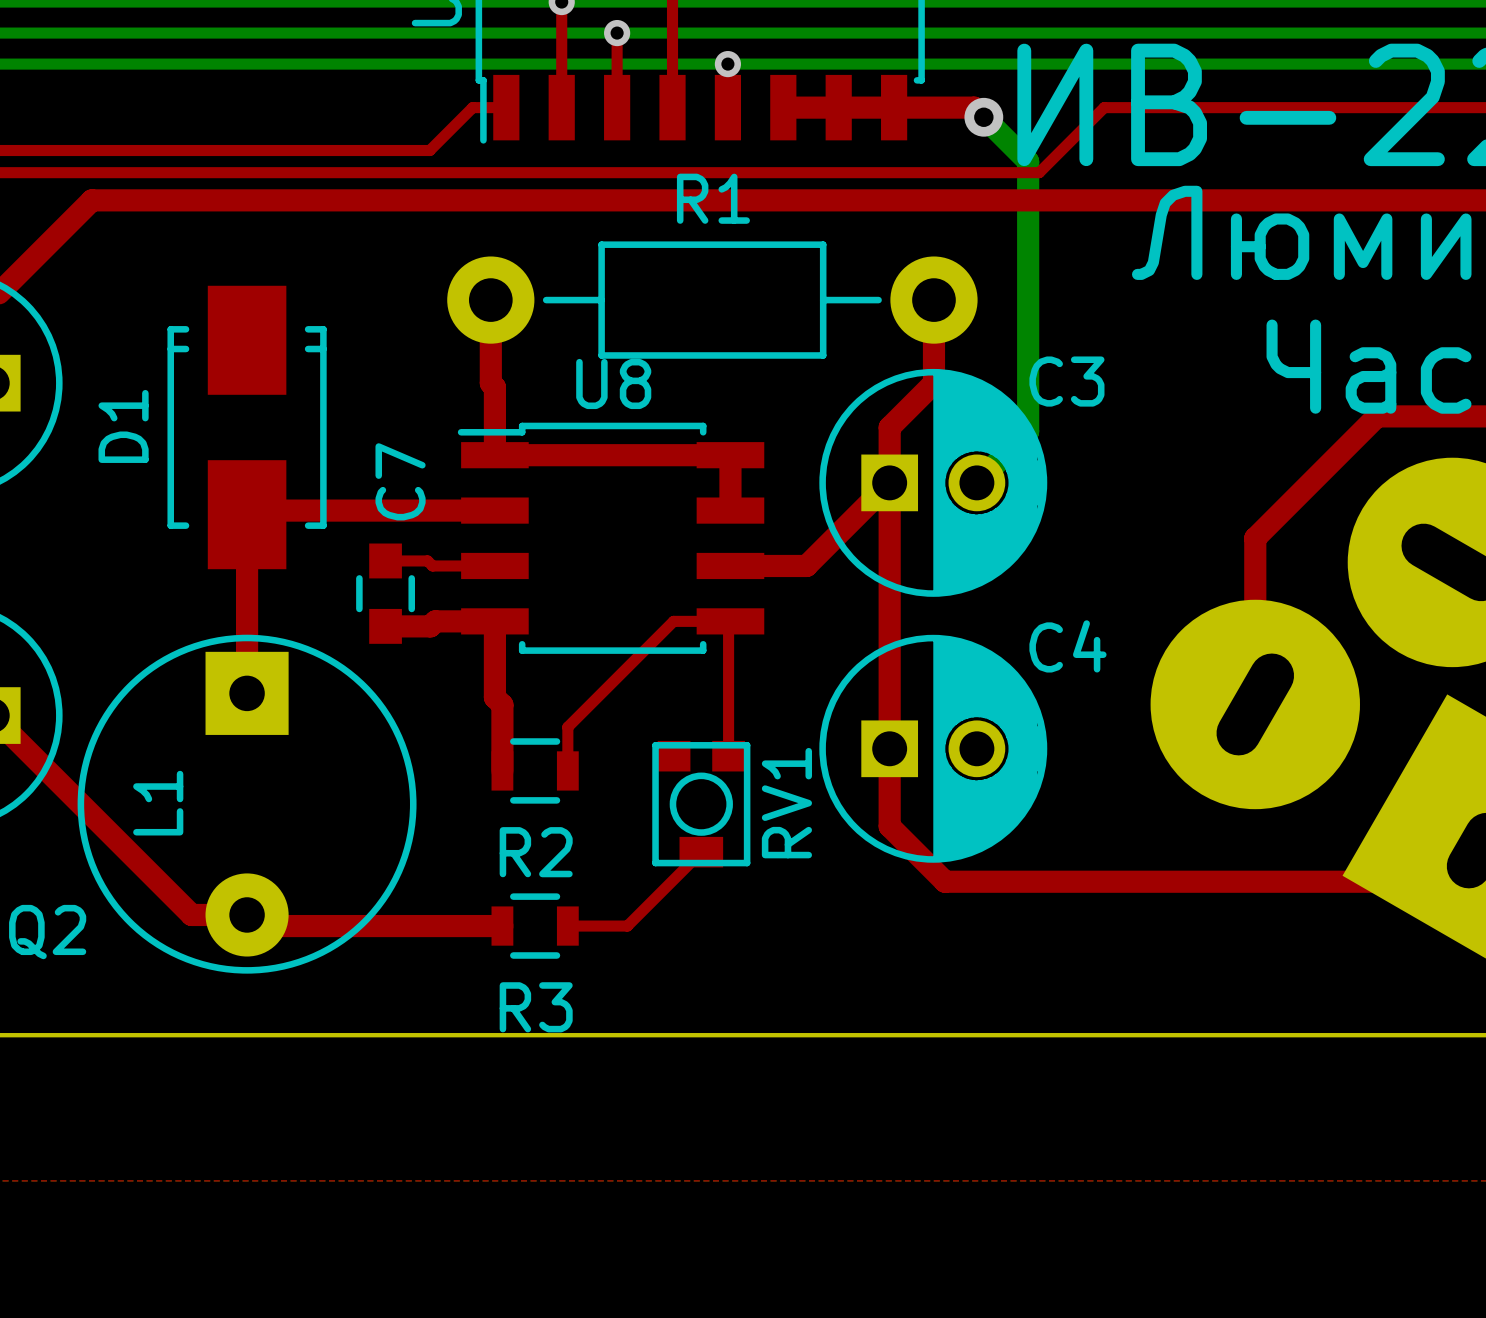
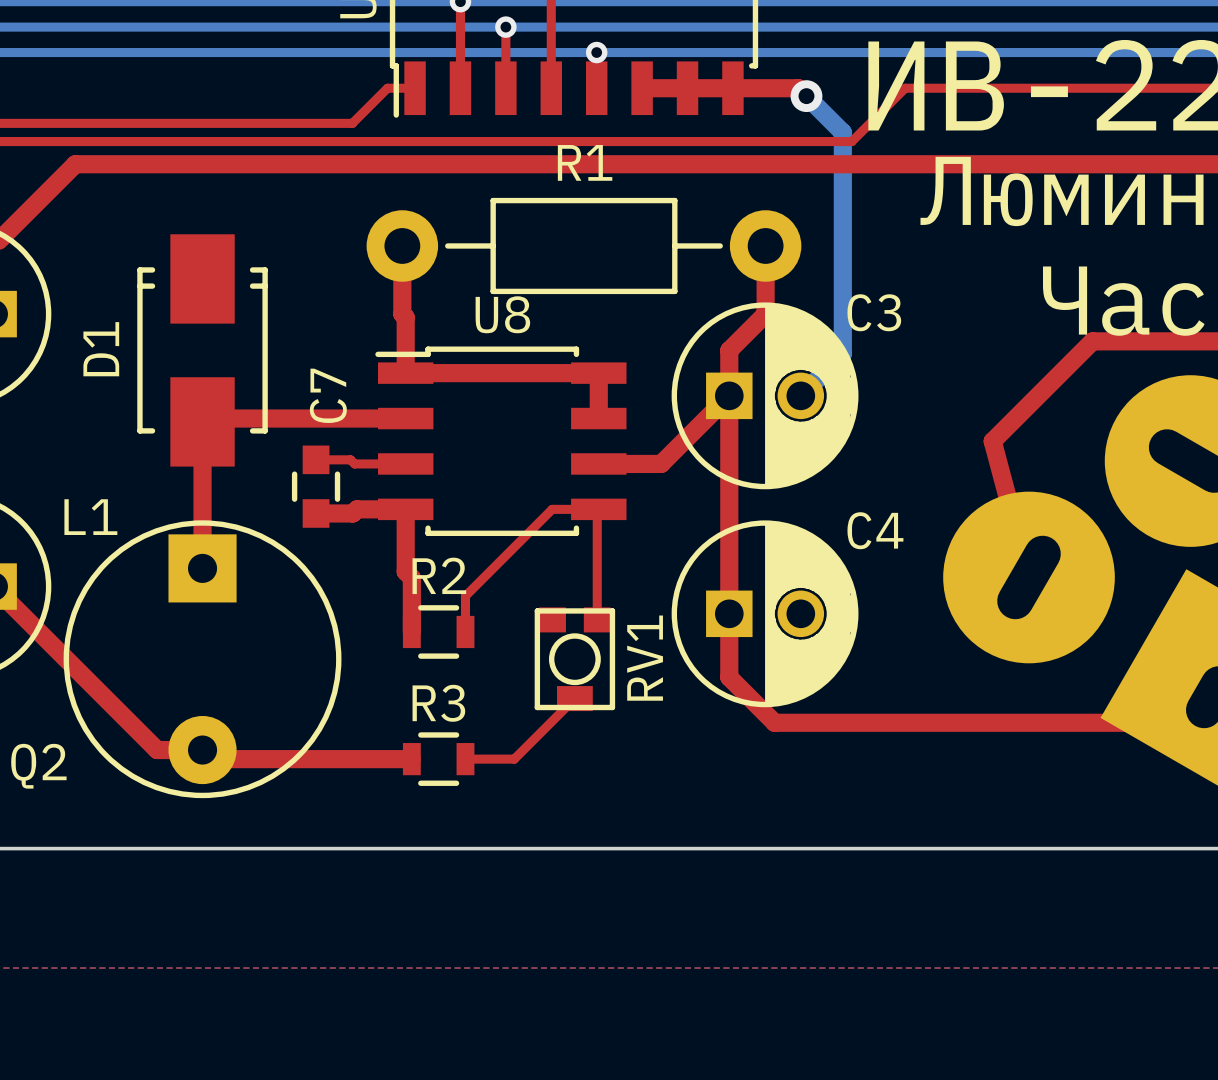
top track: (1377, 416) (1255, 538) (1255, 704) -> (1128, 341) (1092, 341) (992, 441) (1029, 577)
L1 name rotation: 0° (158, 803) -> 90° clockwise (90, 517)
L1 name position: L1 (158, 803) -> L1 (90, 517)
R2 name position: R2 (536, 852) -> R2 (439, 575)
R3 name position: R3 (536, 1007) -> R3 (438, 703)

